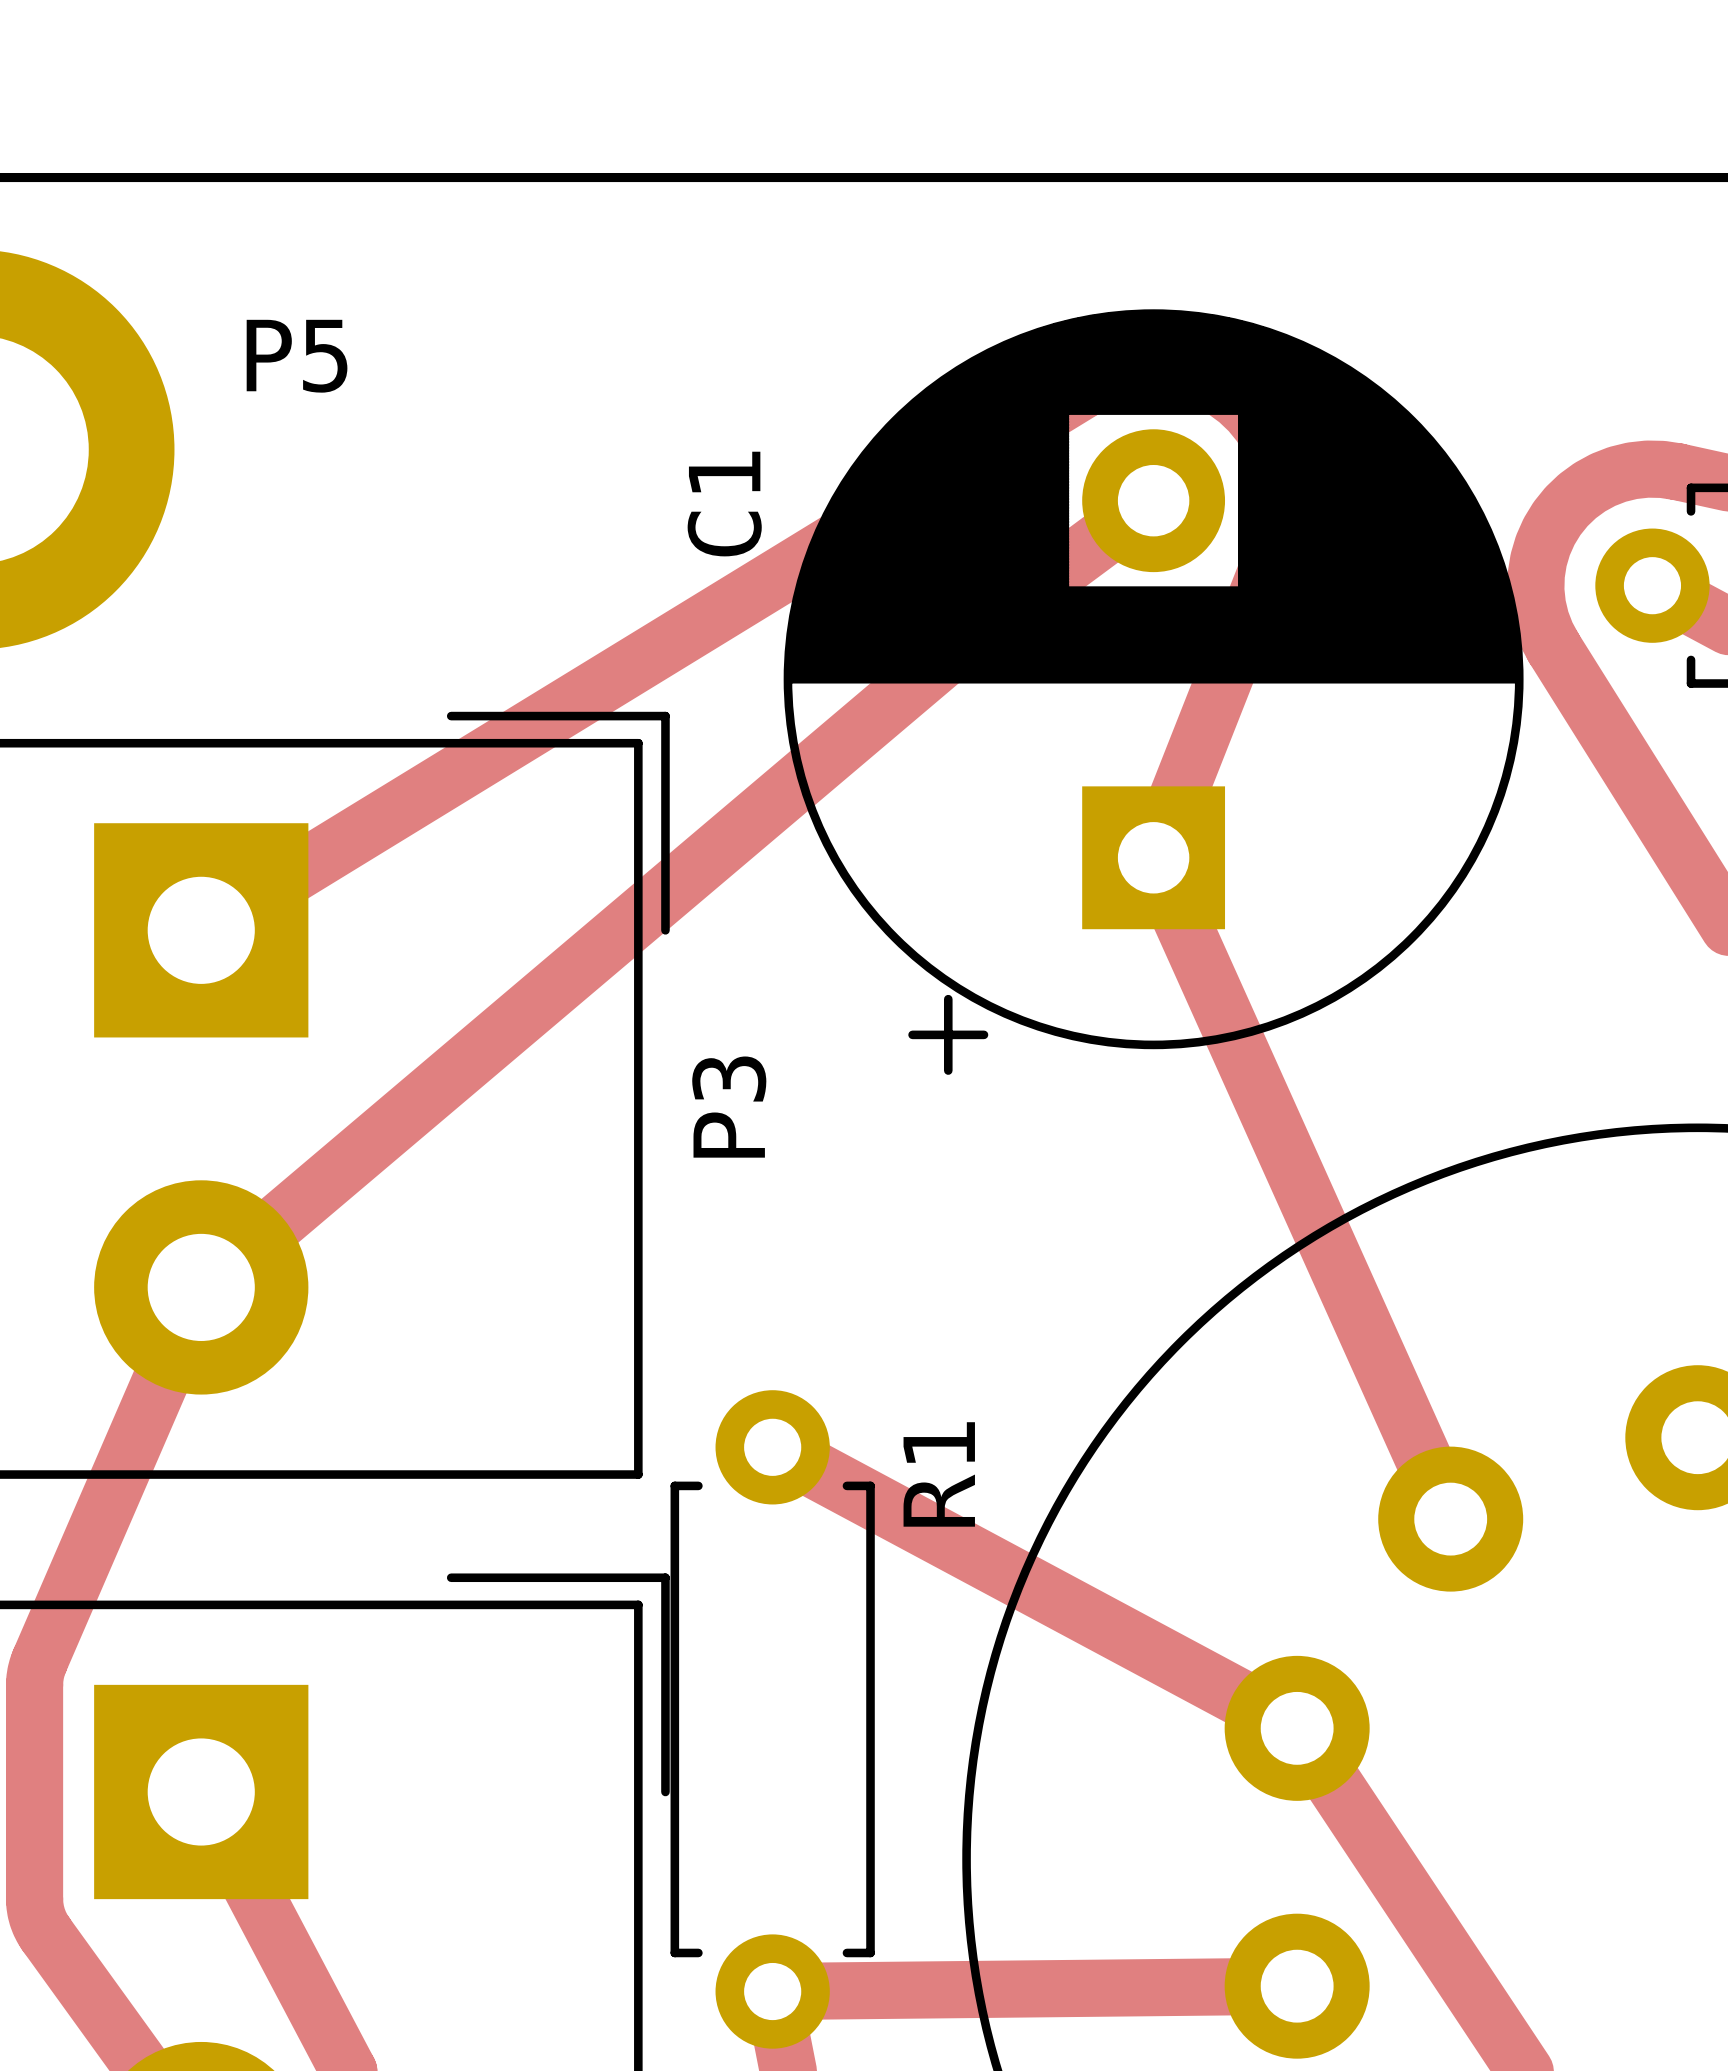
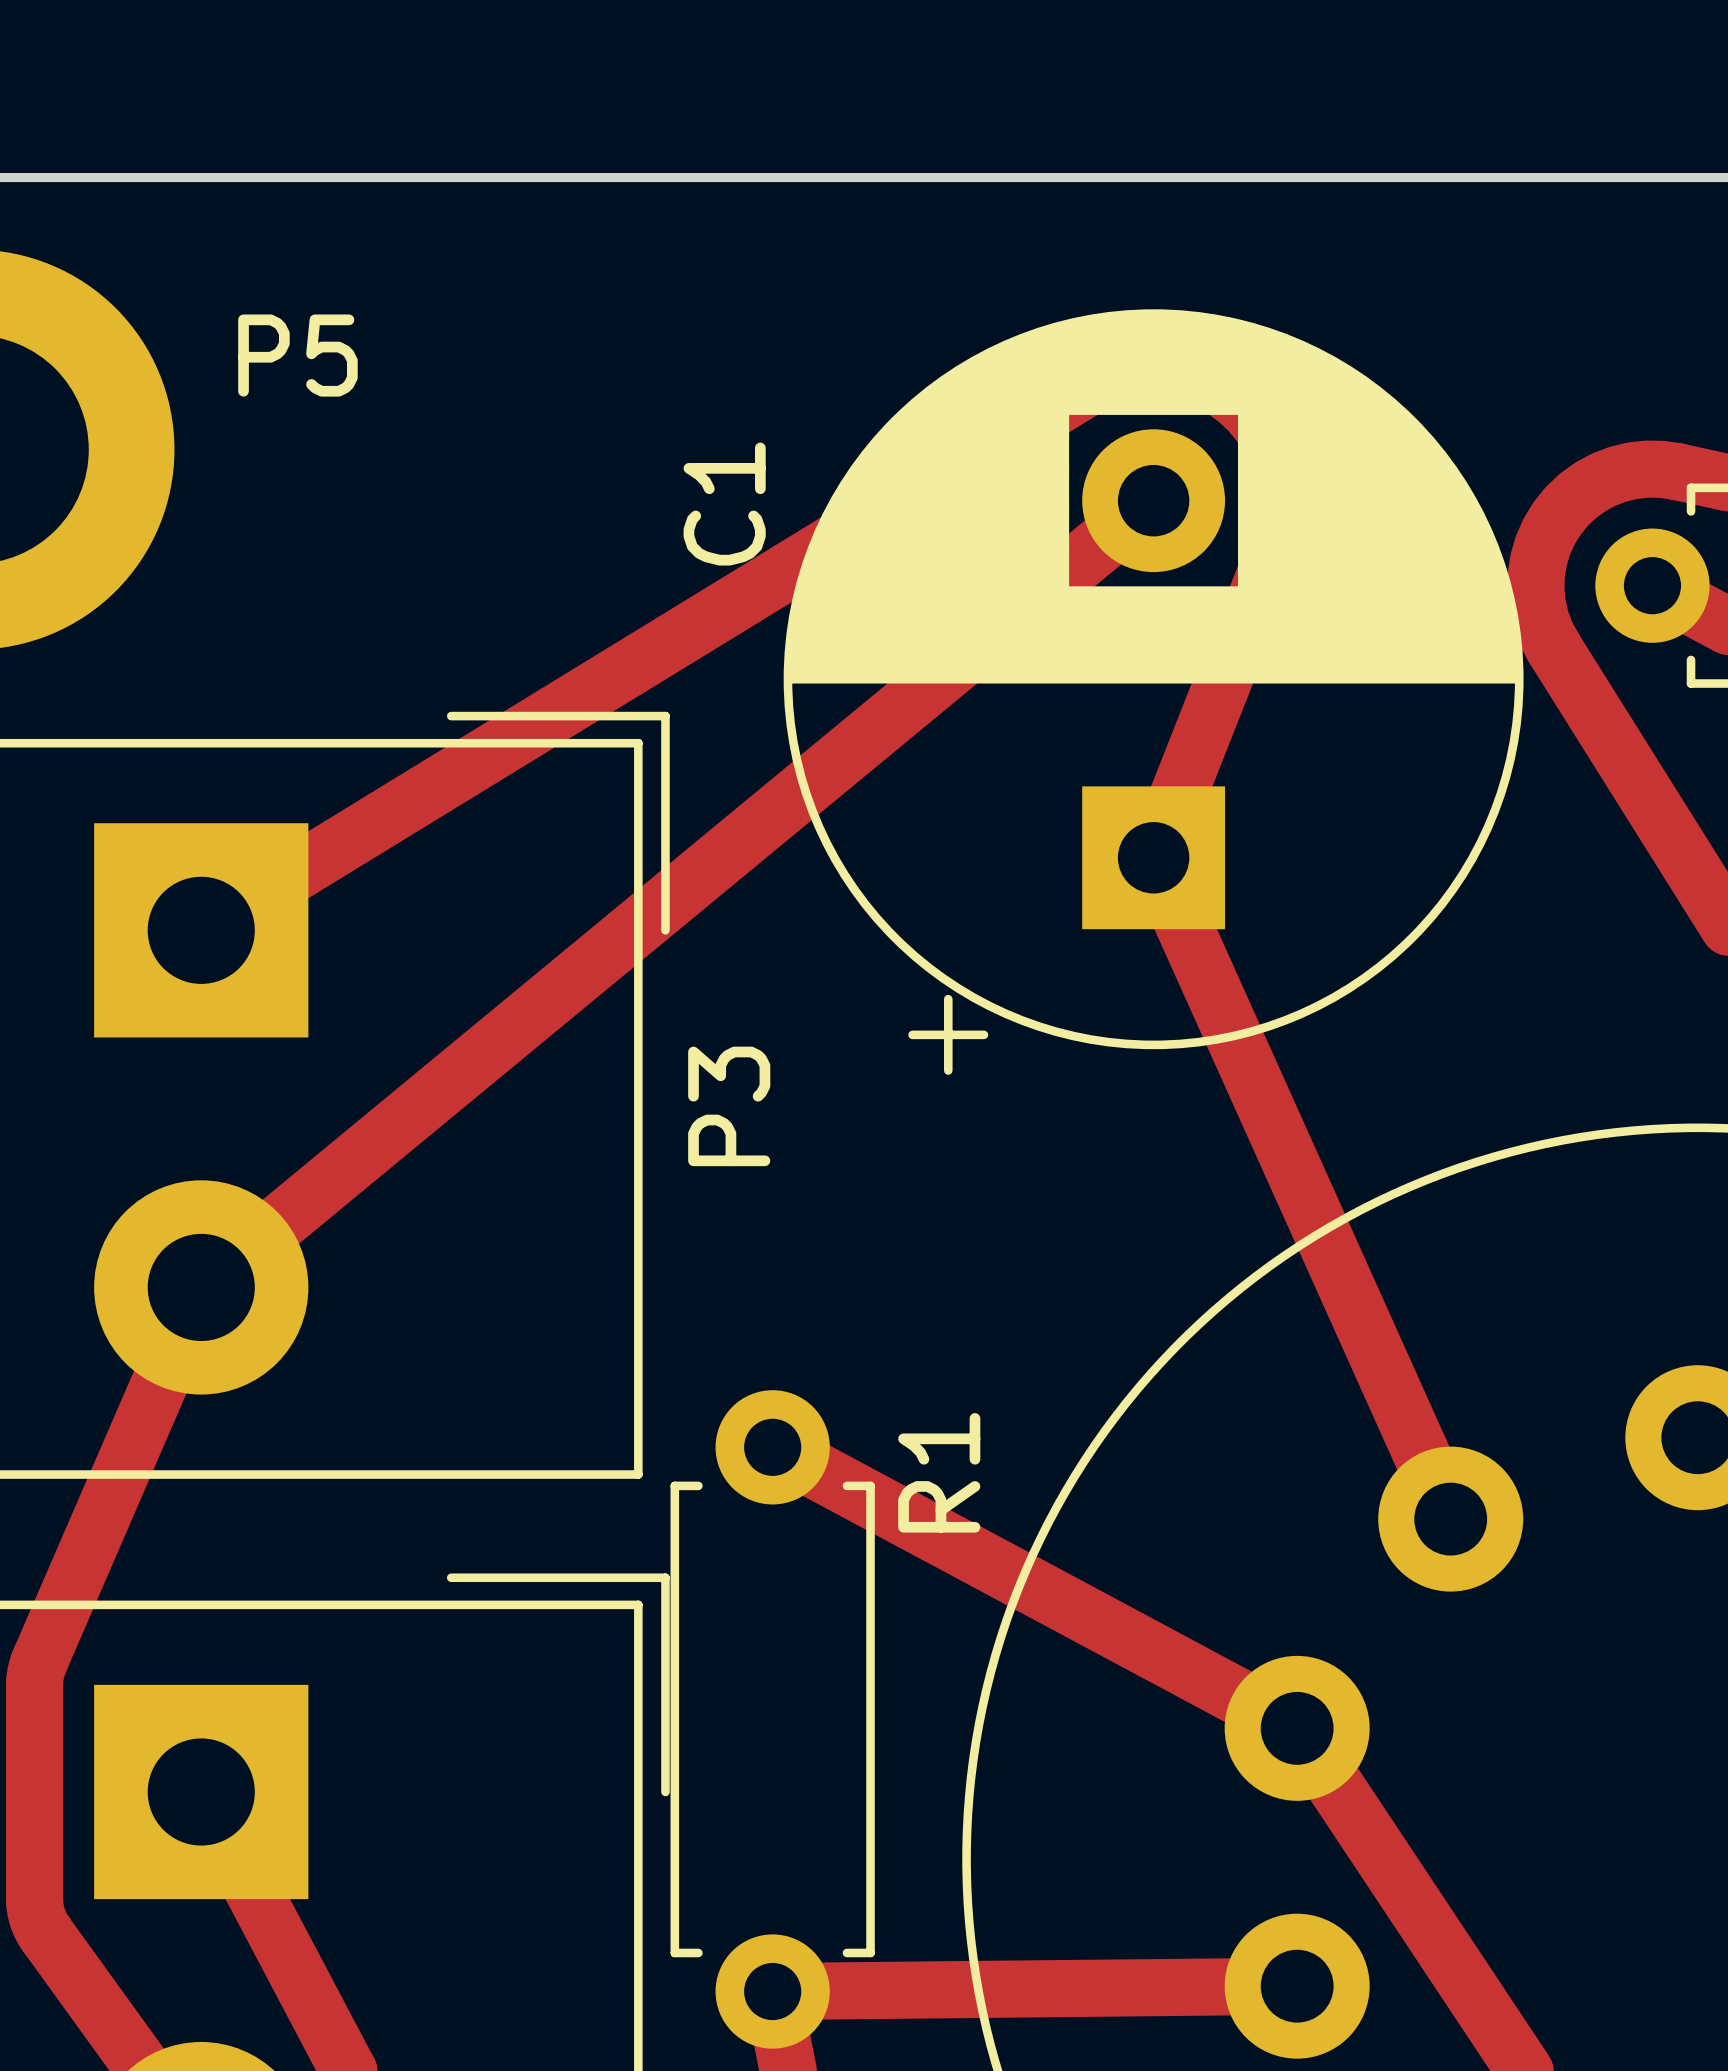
track: (1153, 500) (961, 643) (201, 1287) -> (1153, 500) (201, 1287)

